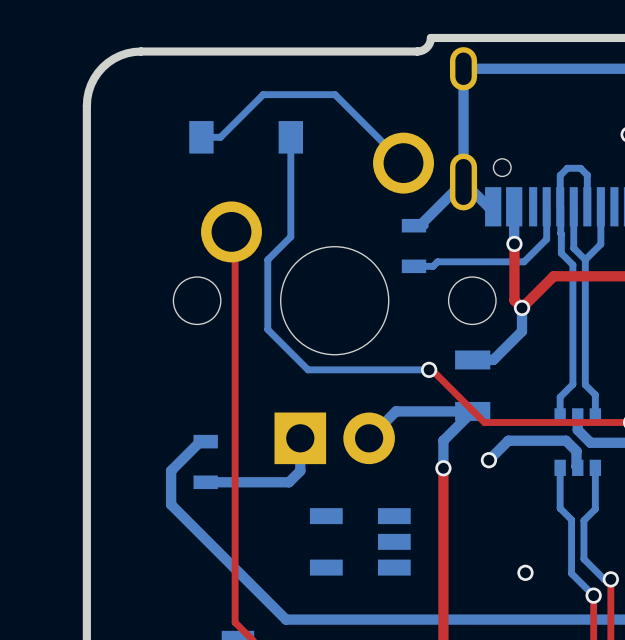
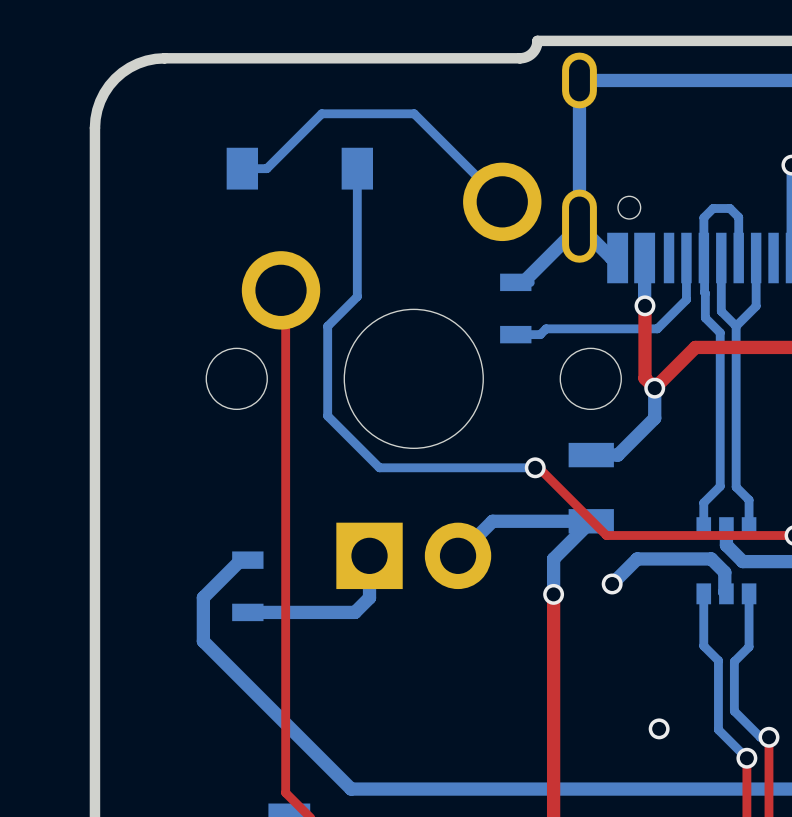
part: (360, 541) -> none

